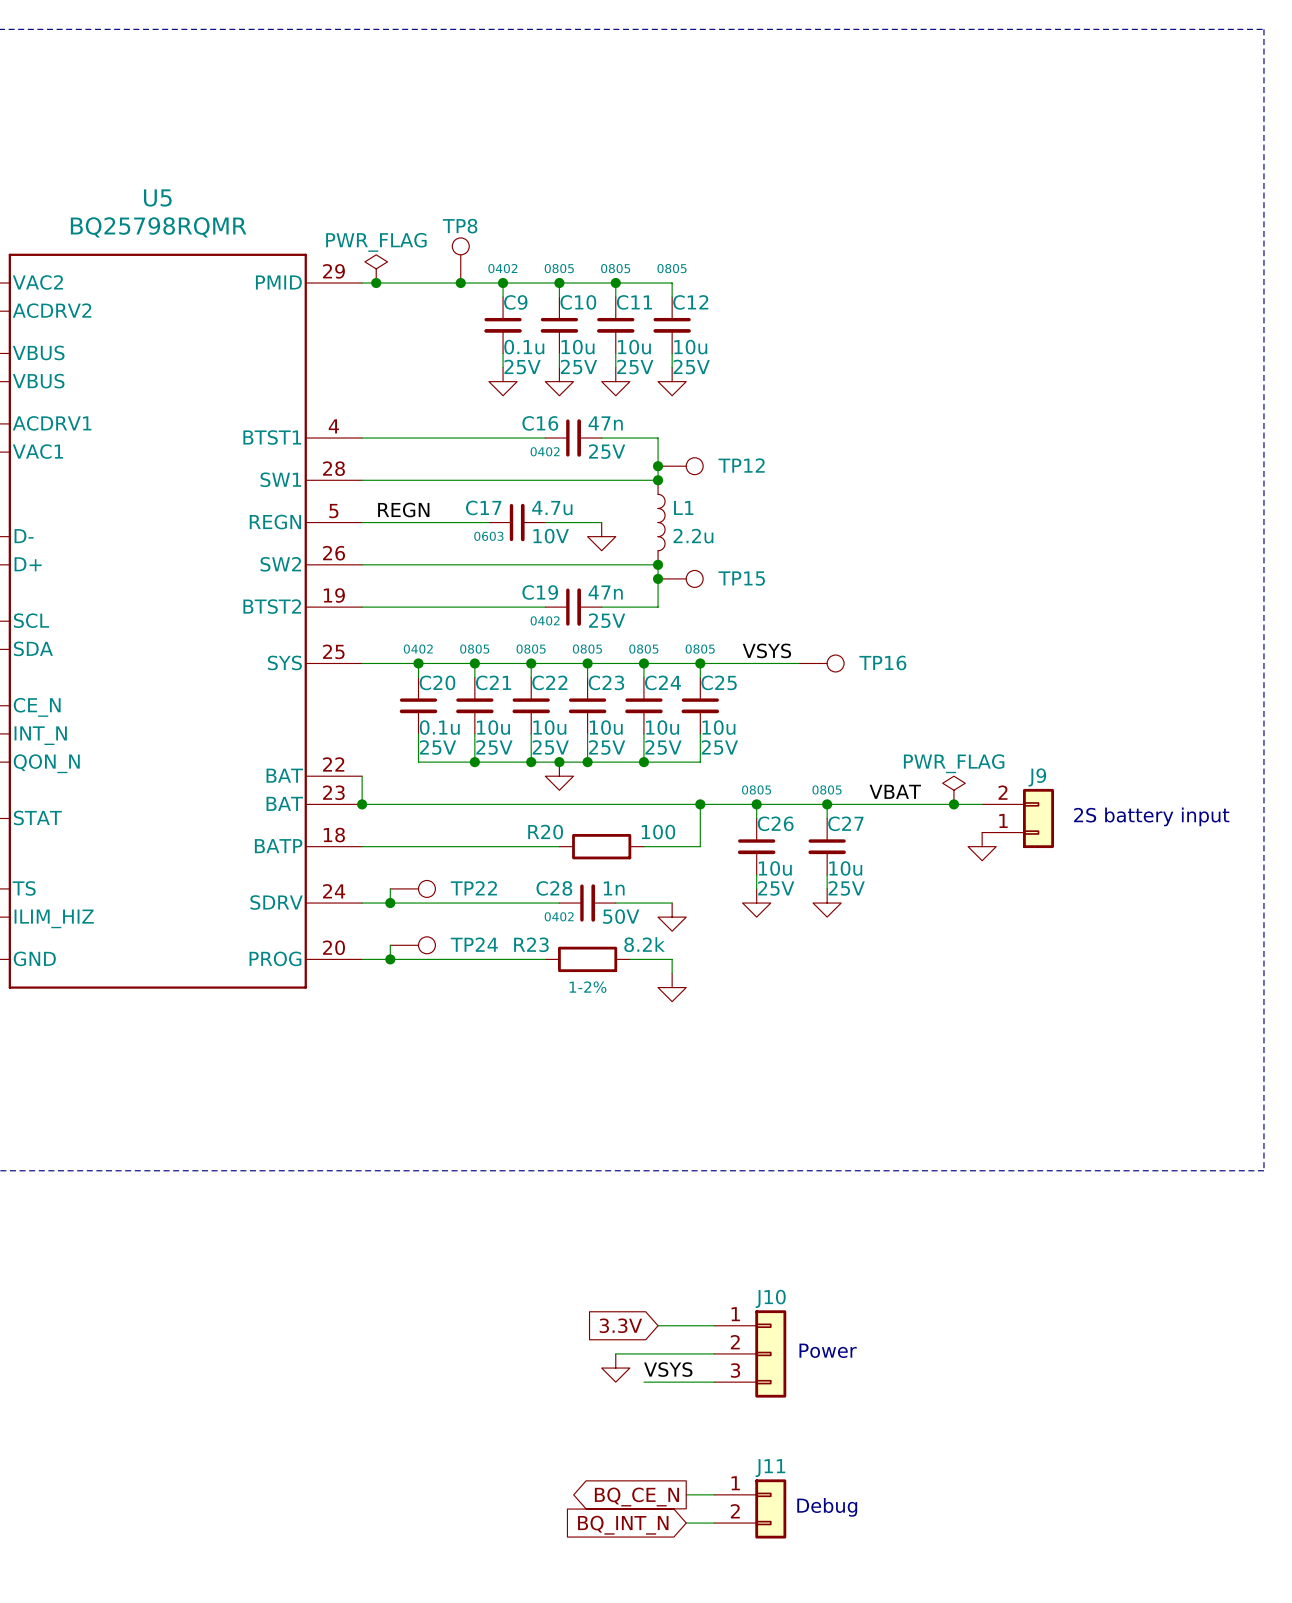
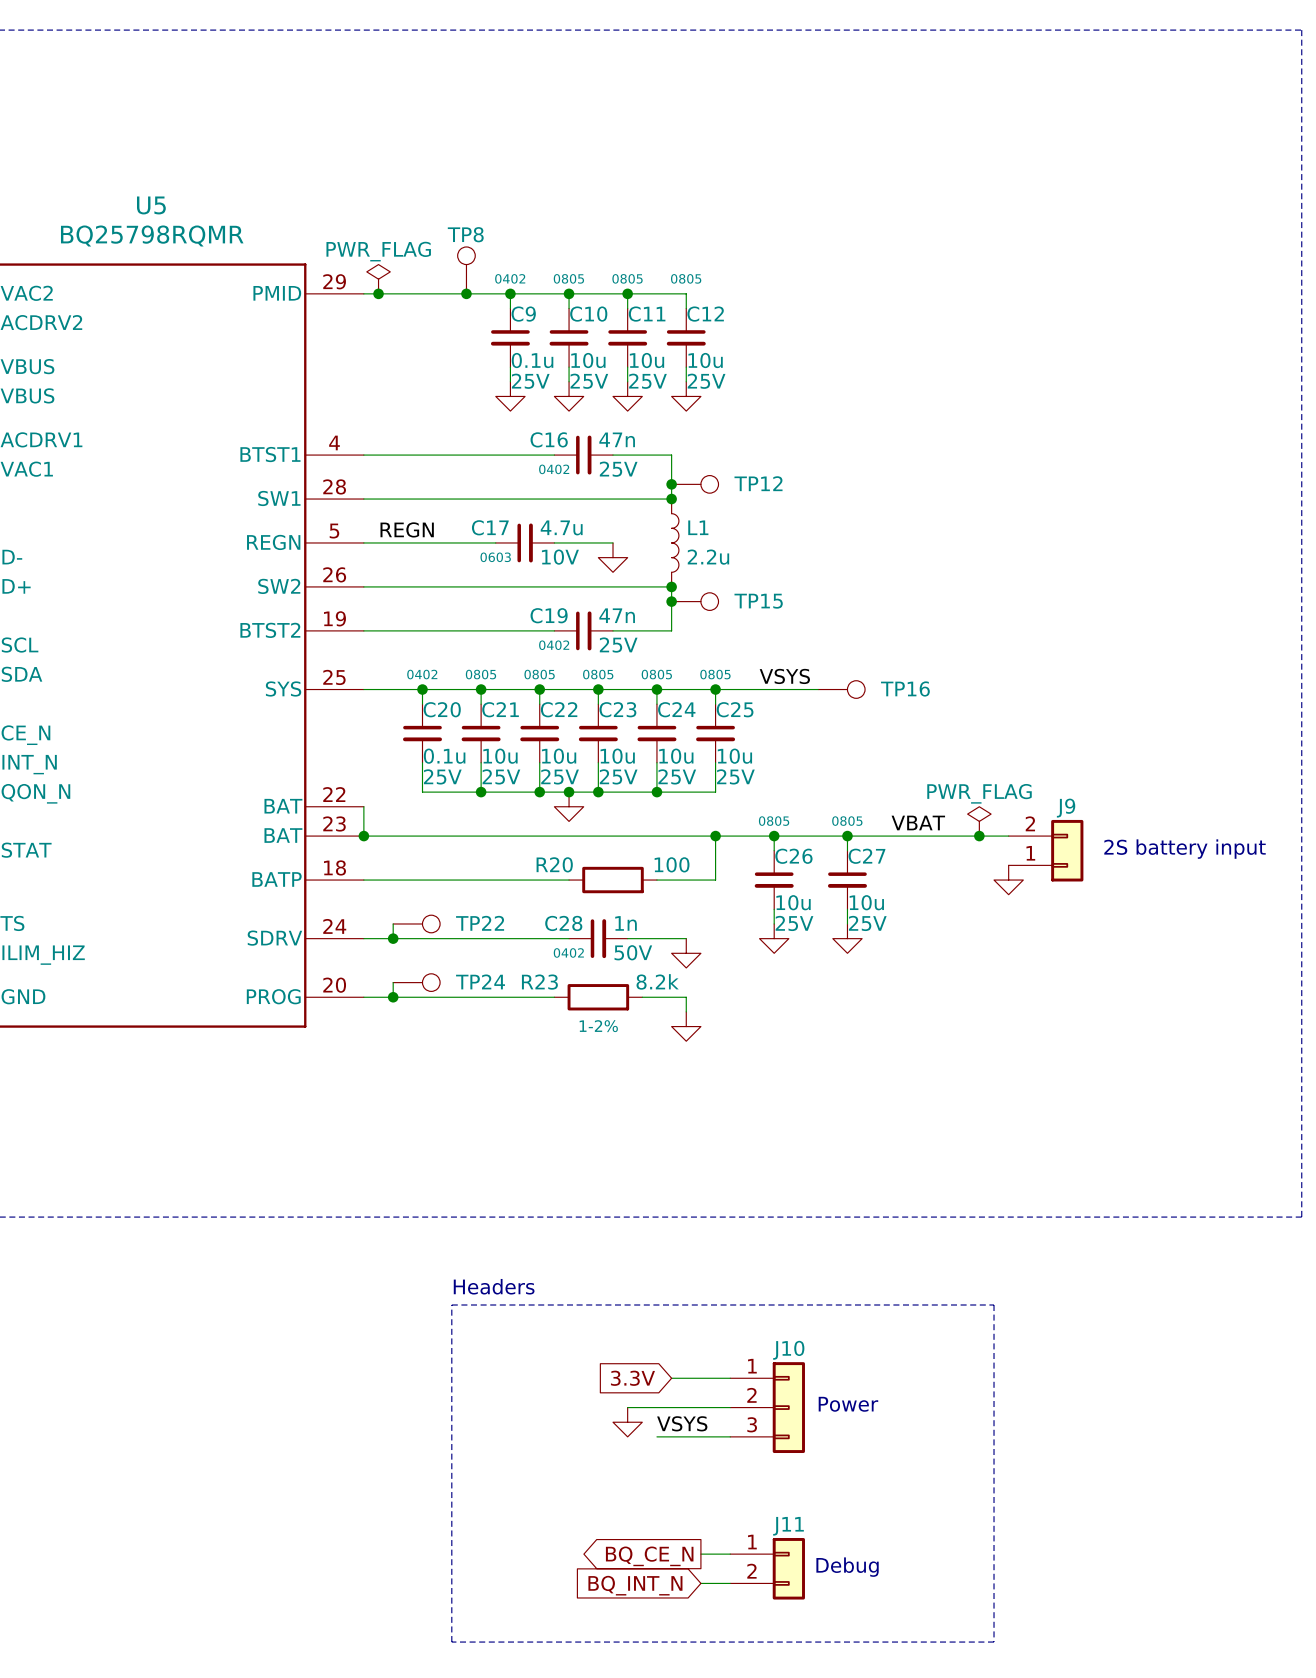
text: none -> Headers (494, 1286)
line: none -> (451, 1305) (994, 1305) (994, 1642) (451, 1642) (451, 1305)

